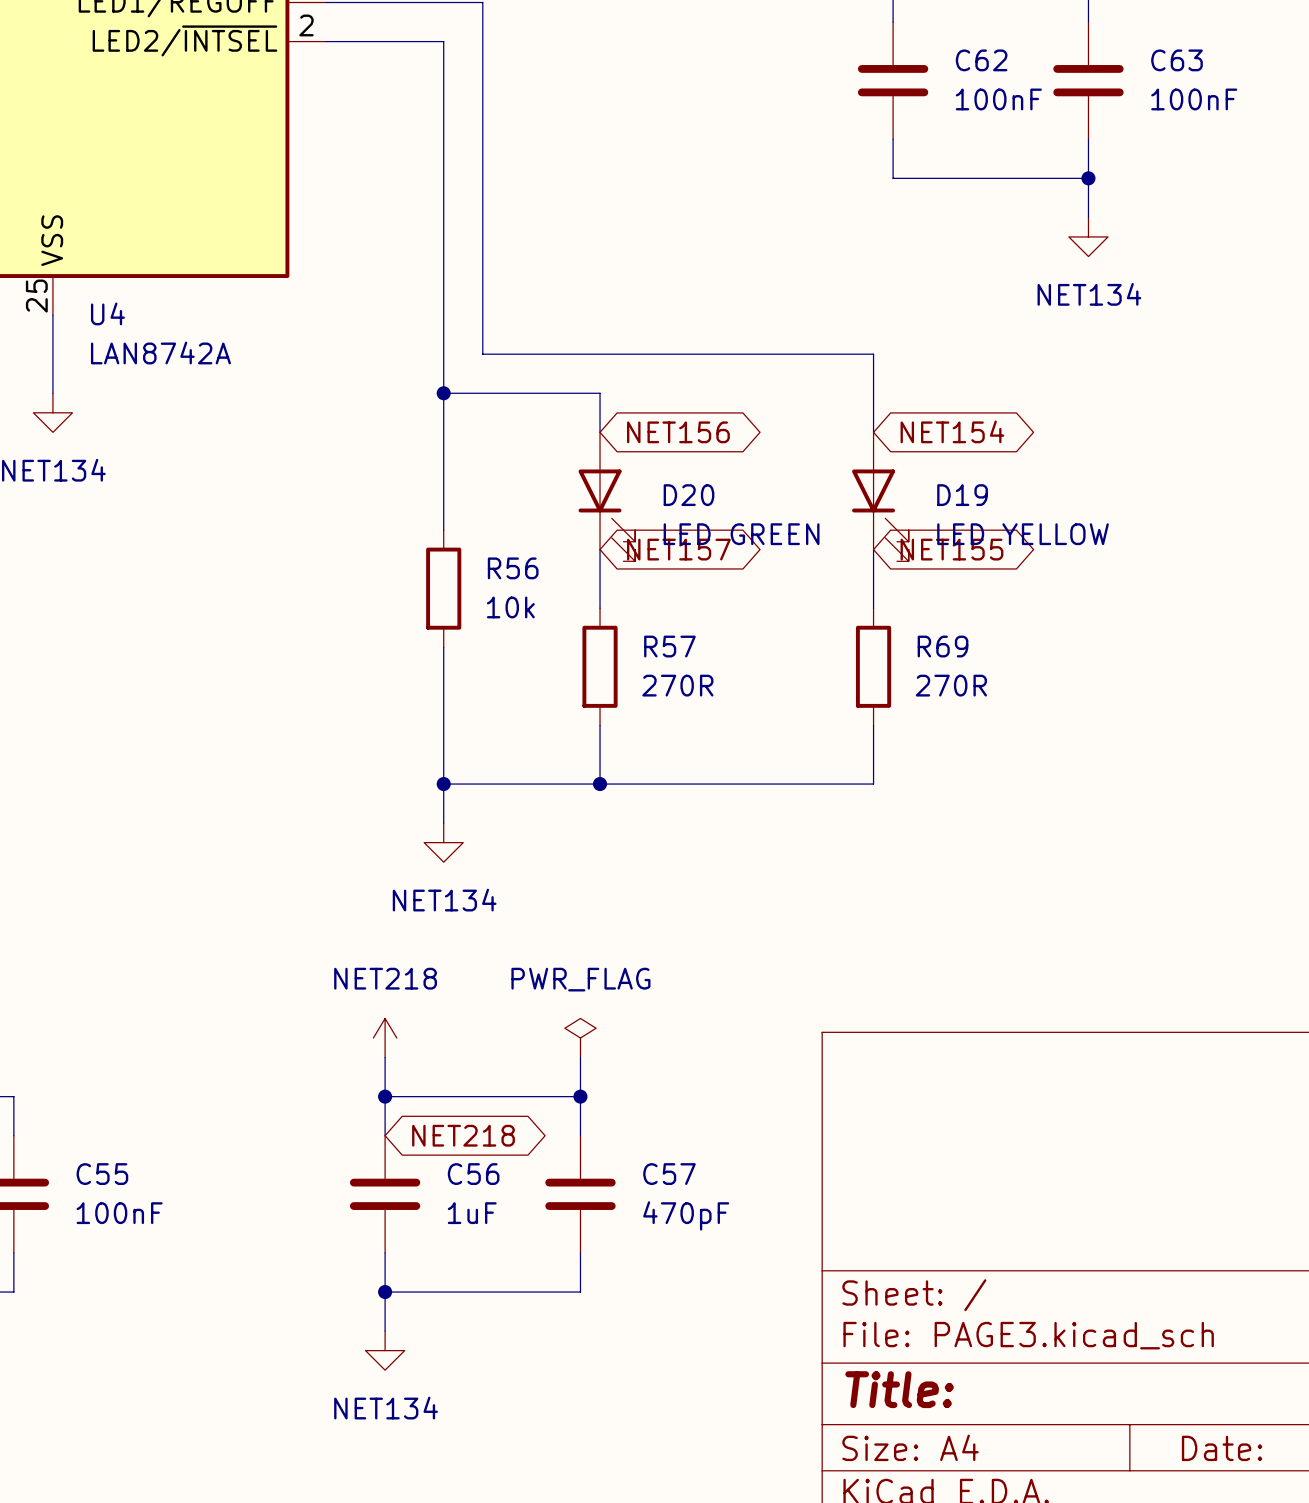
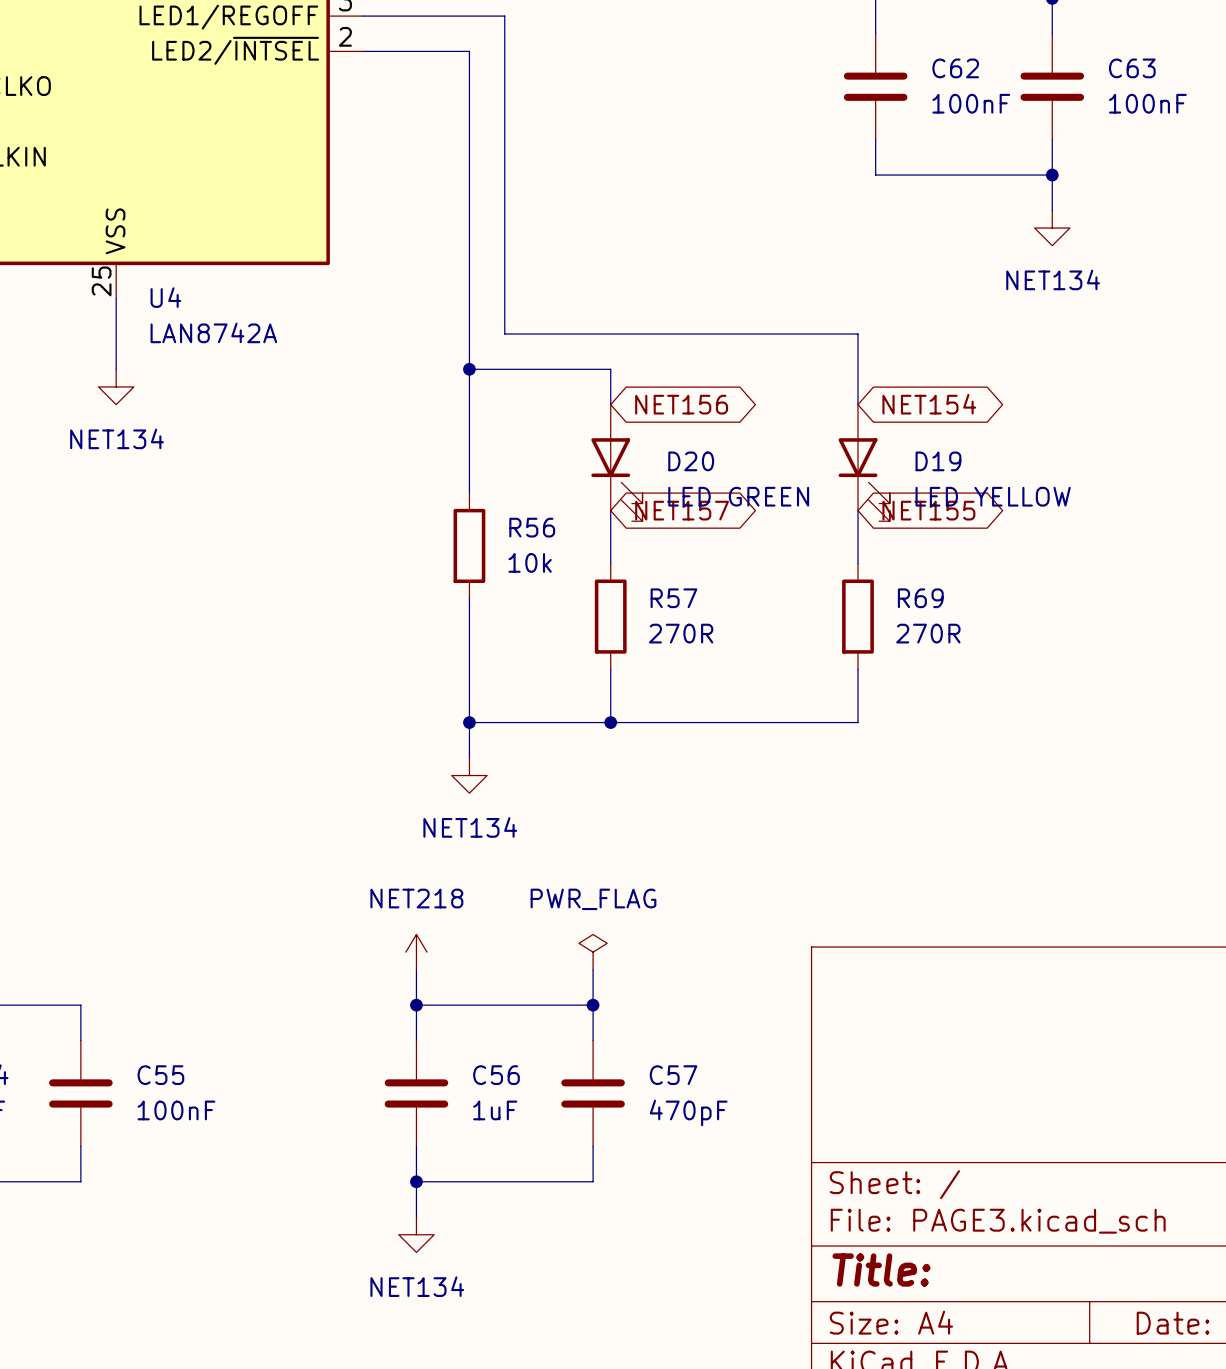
global label: NET218 (463, 1135) -> none

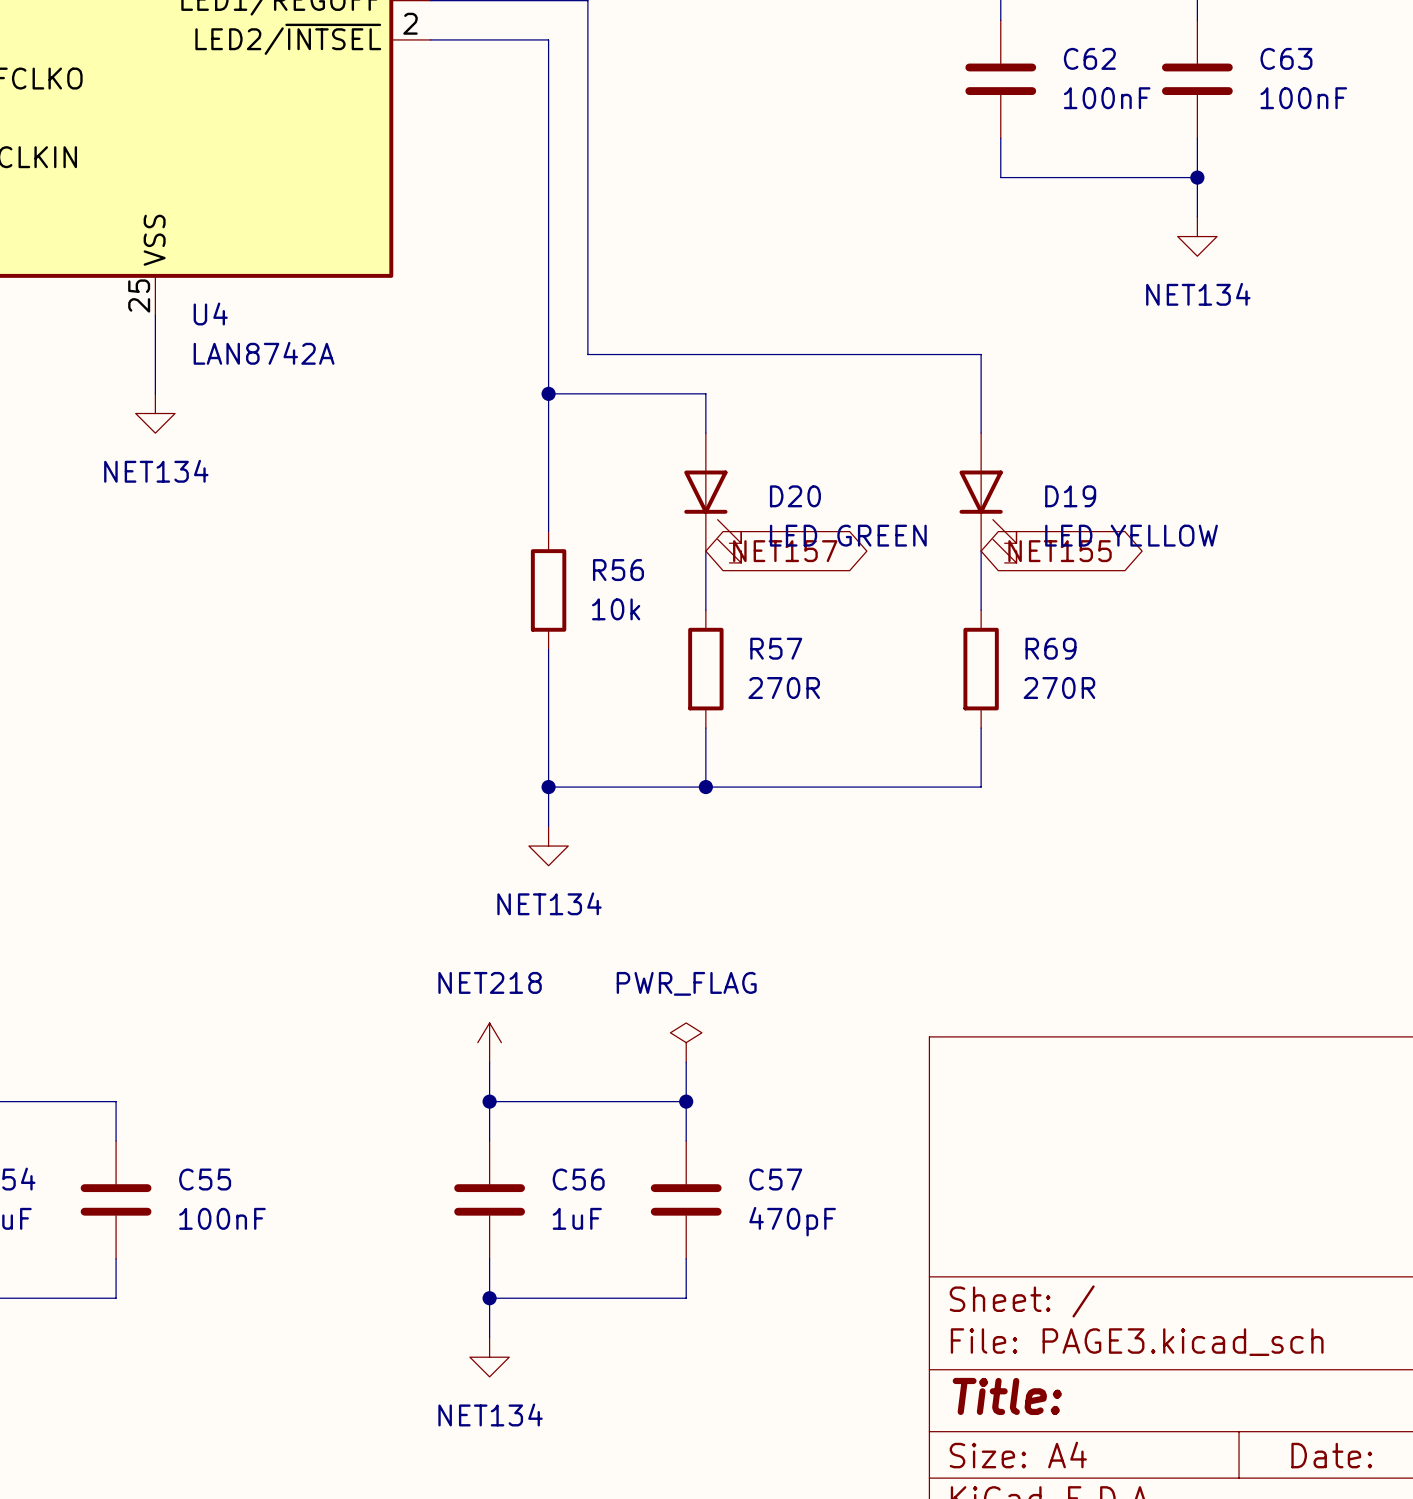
global label: NET156 (681, 404) -> none
global label: NET154 (929, 404) -> none

